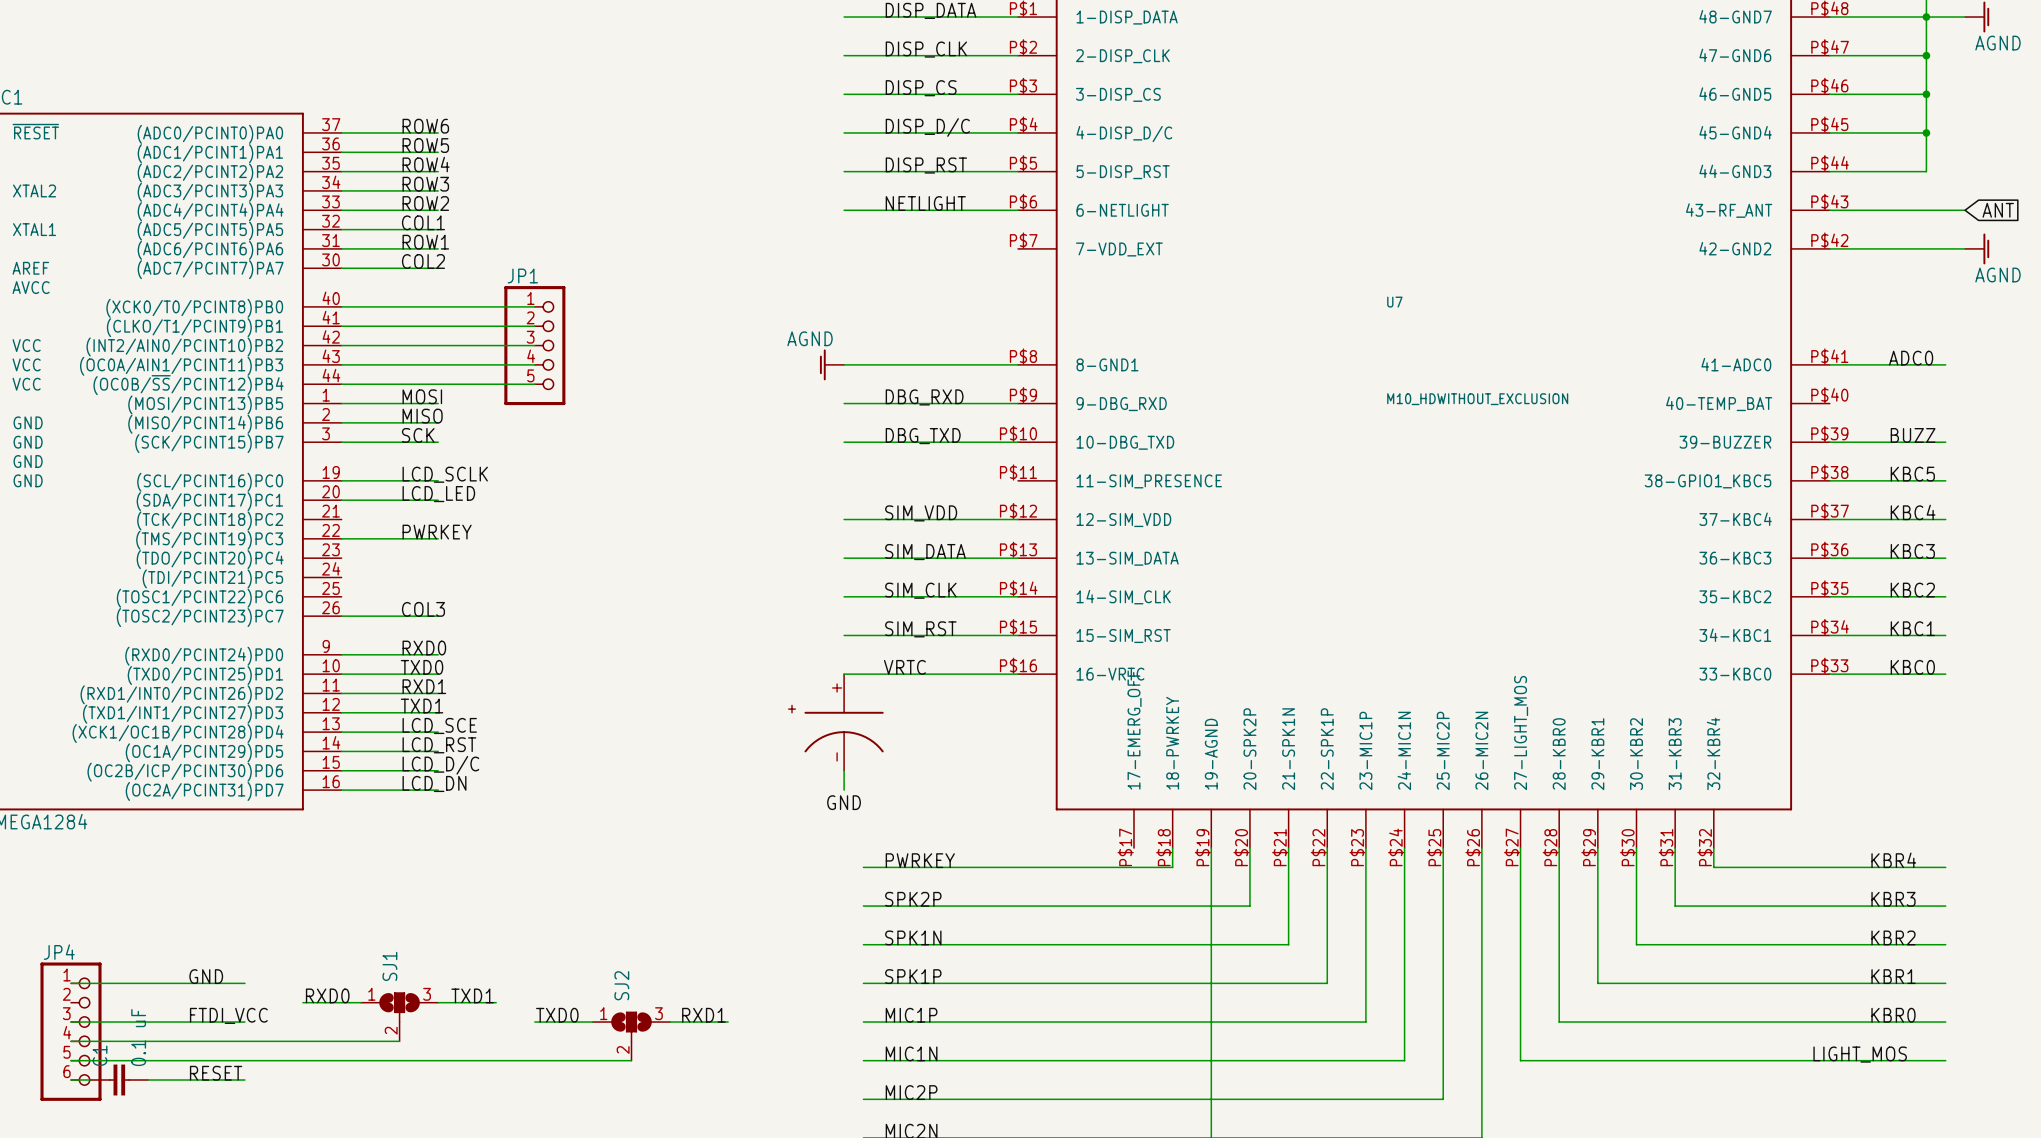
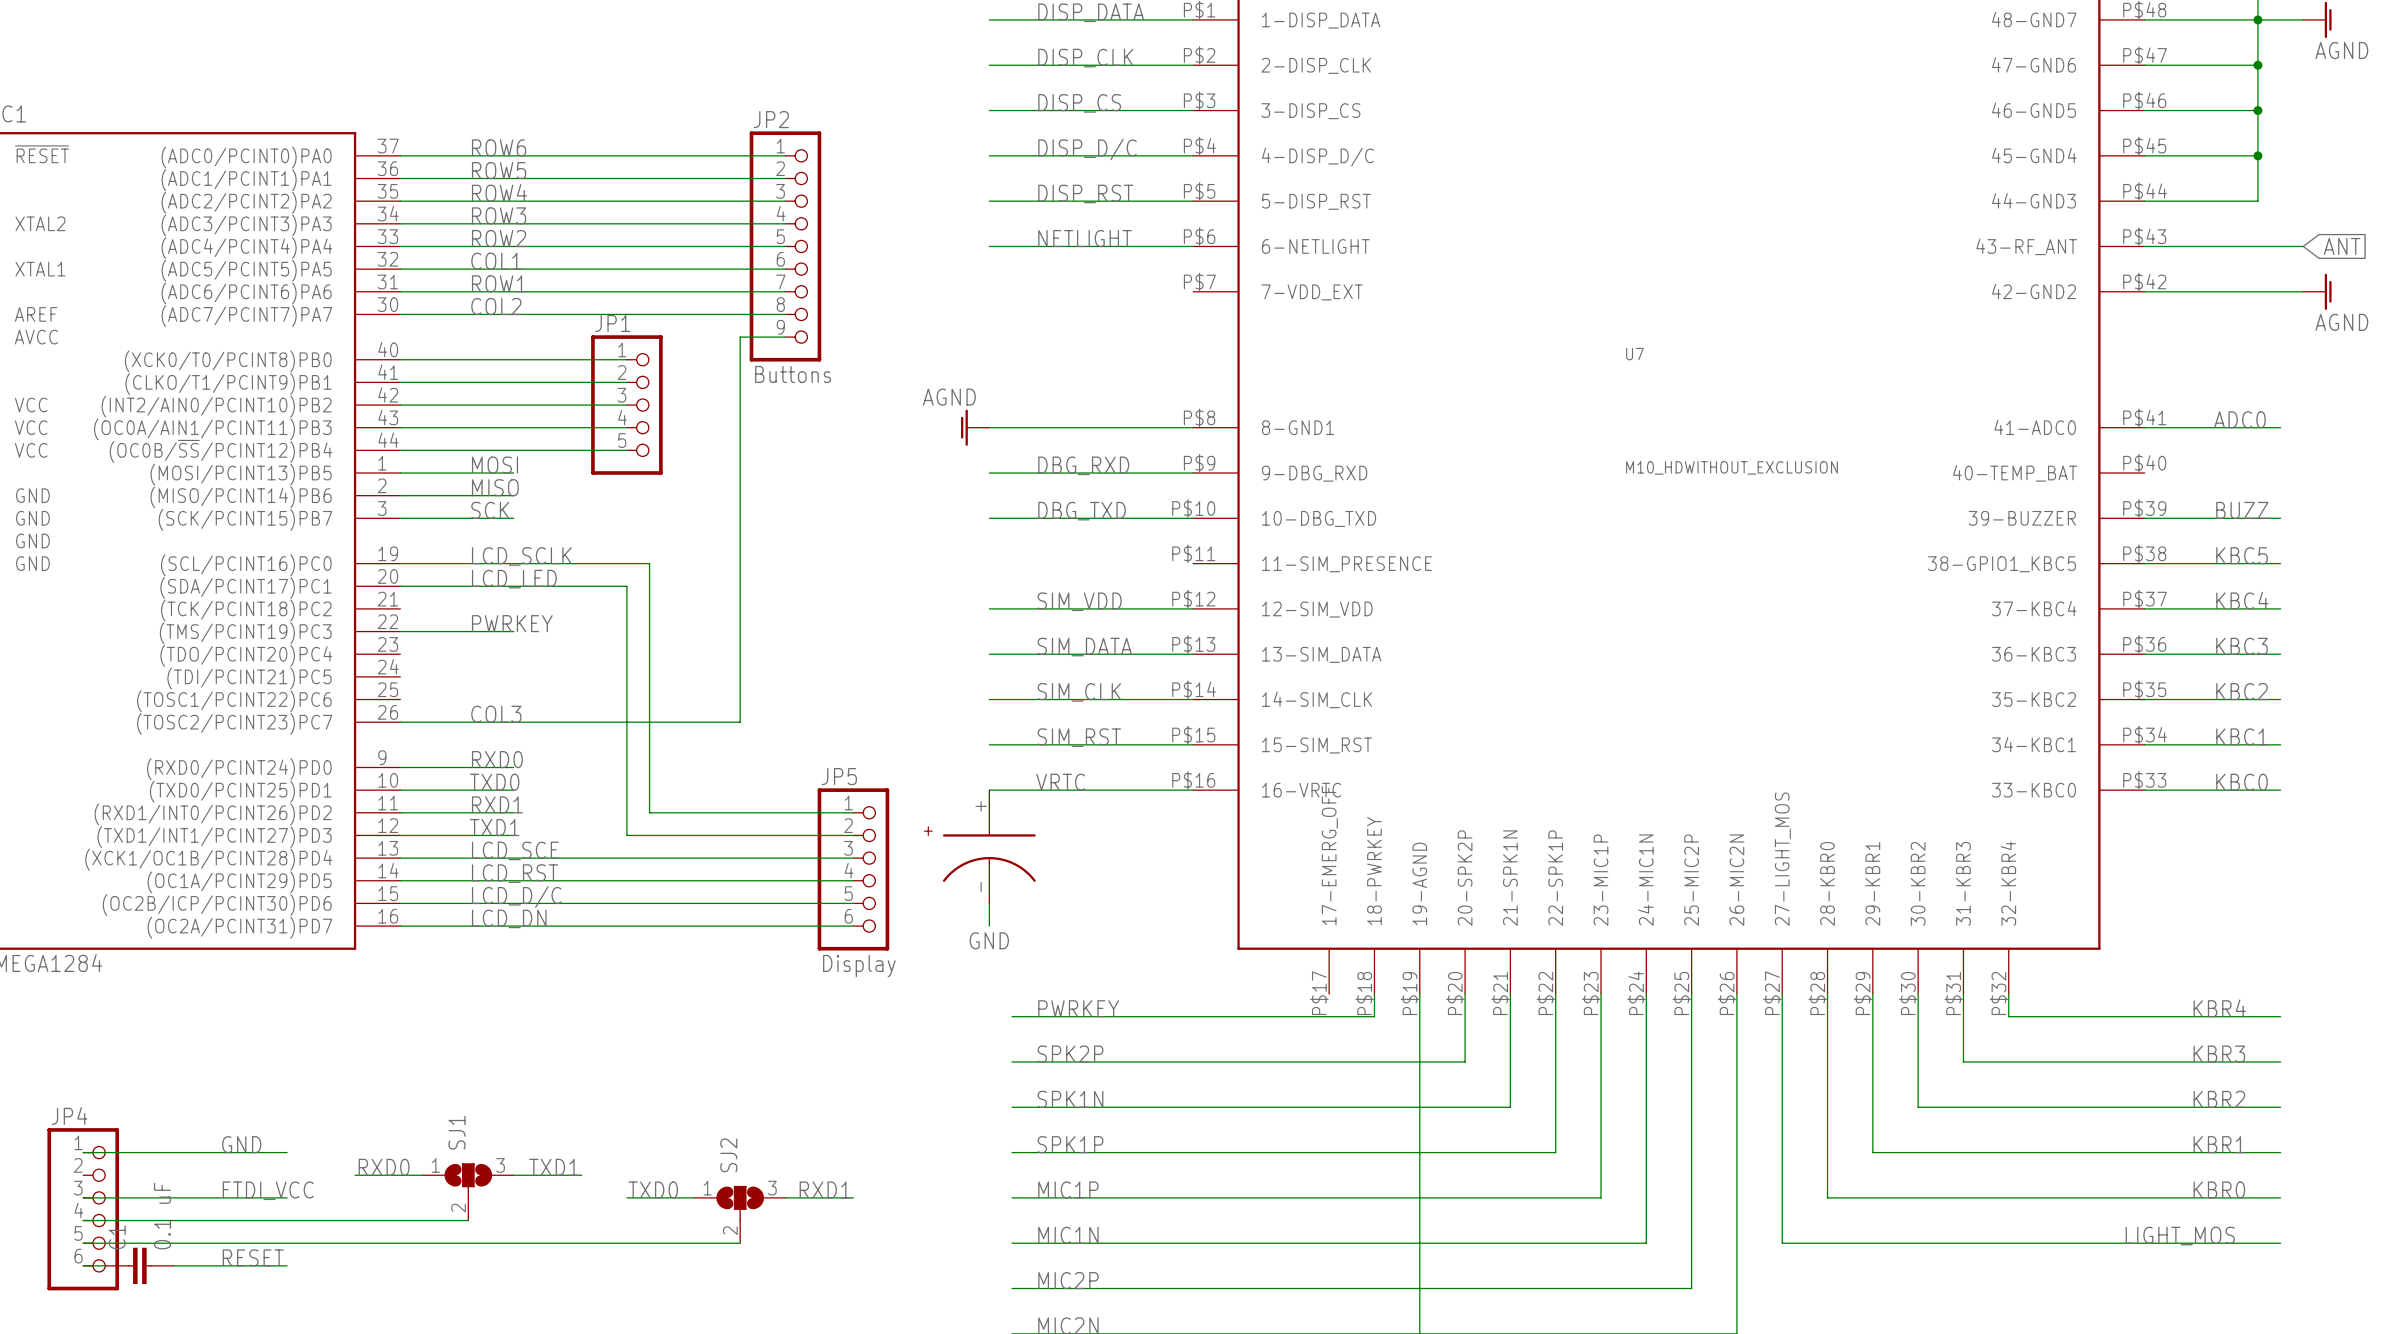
wire: none -> (513, 155) (785, 155)
wire: none -> (513, 178) (785, 178)
wire: none -> (513, 201) (785, 201)
wire: none -> (513, 223) (785, 223)
wire: none -> (513, 246) (785, 246)
JP2: none -> Buttons (785, 246)
wire: none -> (513, 269) (785, 269)
wire: none -> (513, 291) (785, 291)
wire: none -> (513, 314) (785, 314)
wire: none -> (785, 337) (740, 337) (740, 722) (513, 722)
wire: none -> (513, 563) (649, 563) (649, 812) (853, 812)
wire: none -> (513, 586) (626, 586) (626, 835) (853, 835)
wire: none -> (513, 858) (853, 858)
JP5: none -> Display (853, 869)
wire: none -> (513, 880) (853, 880)
wire: none -> (513, 903) (853, 903)
wire: none -> (513, 926) (853, 926)

